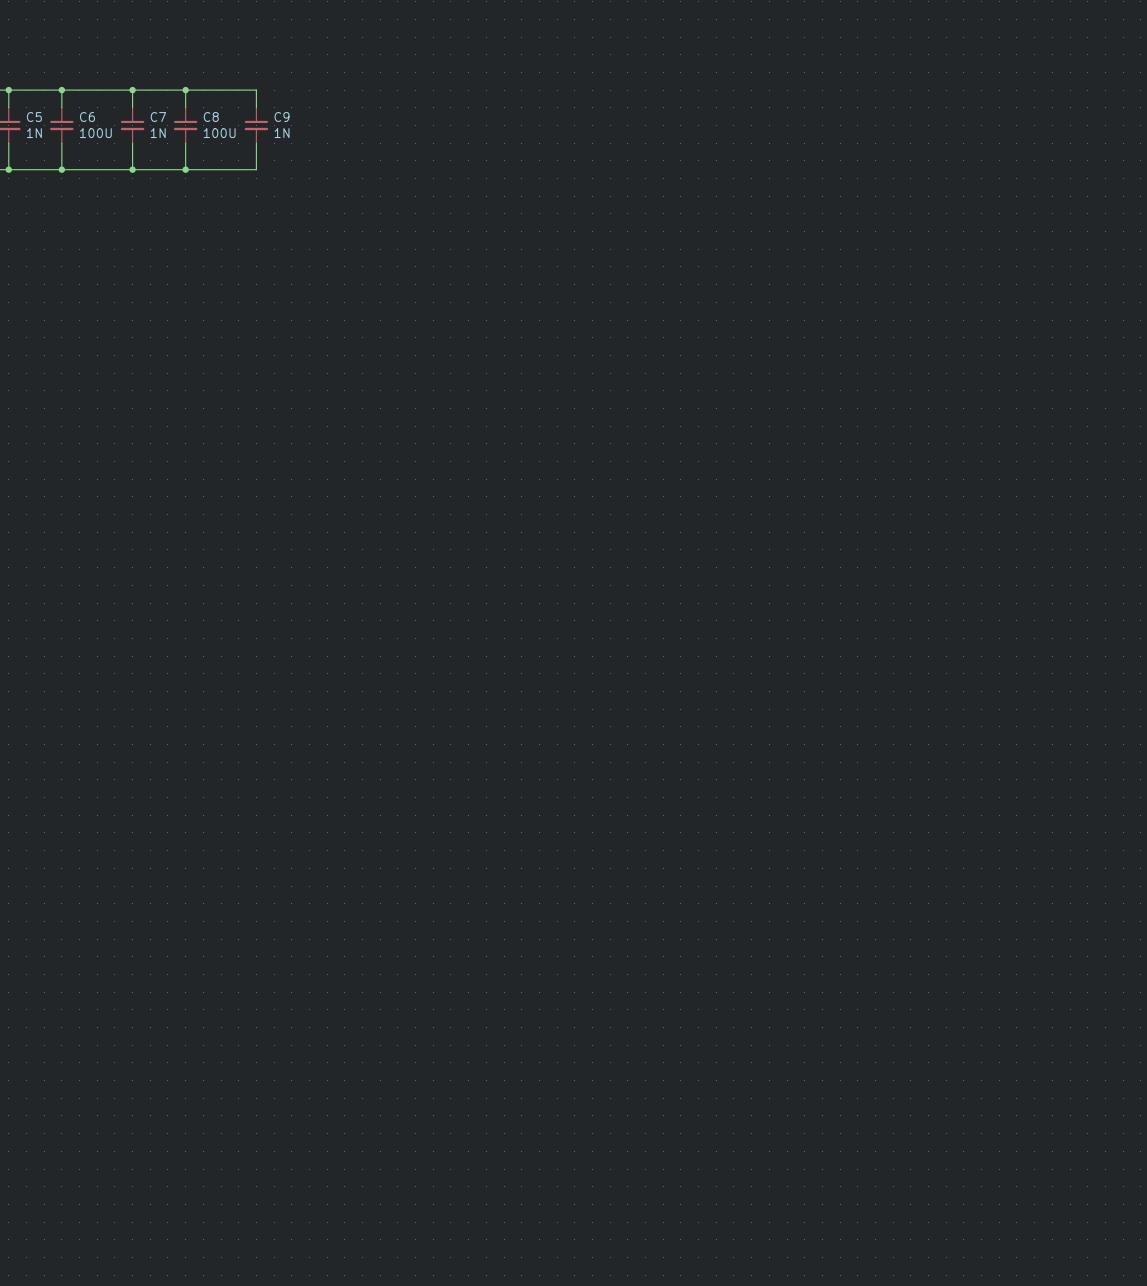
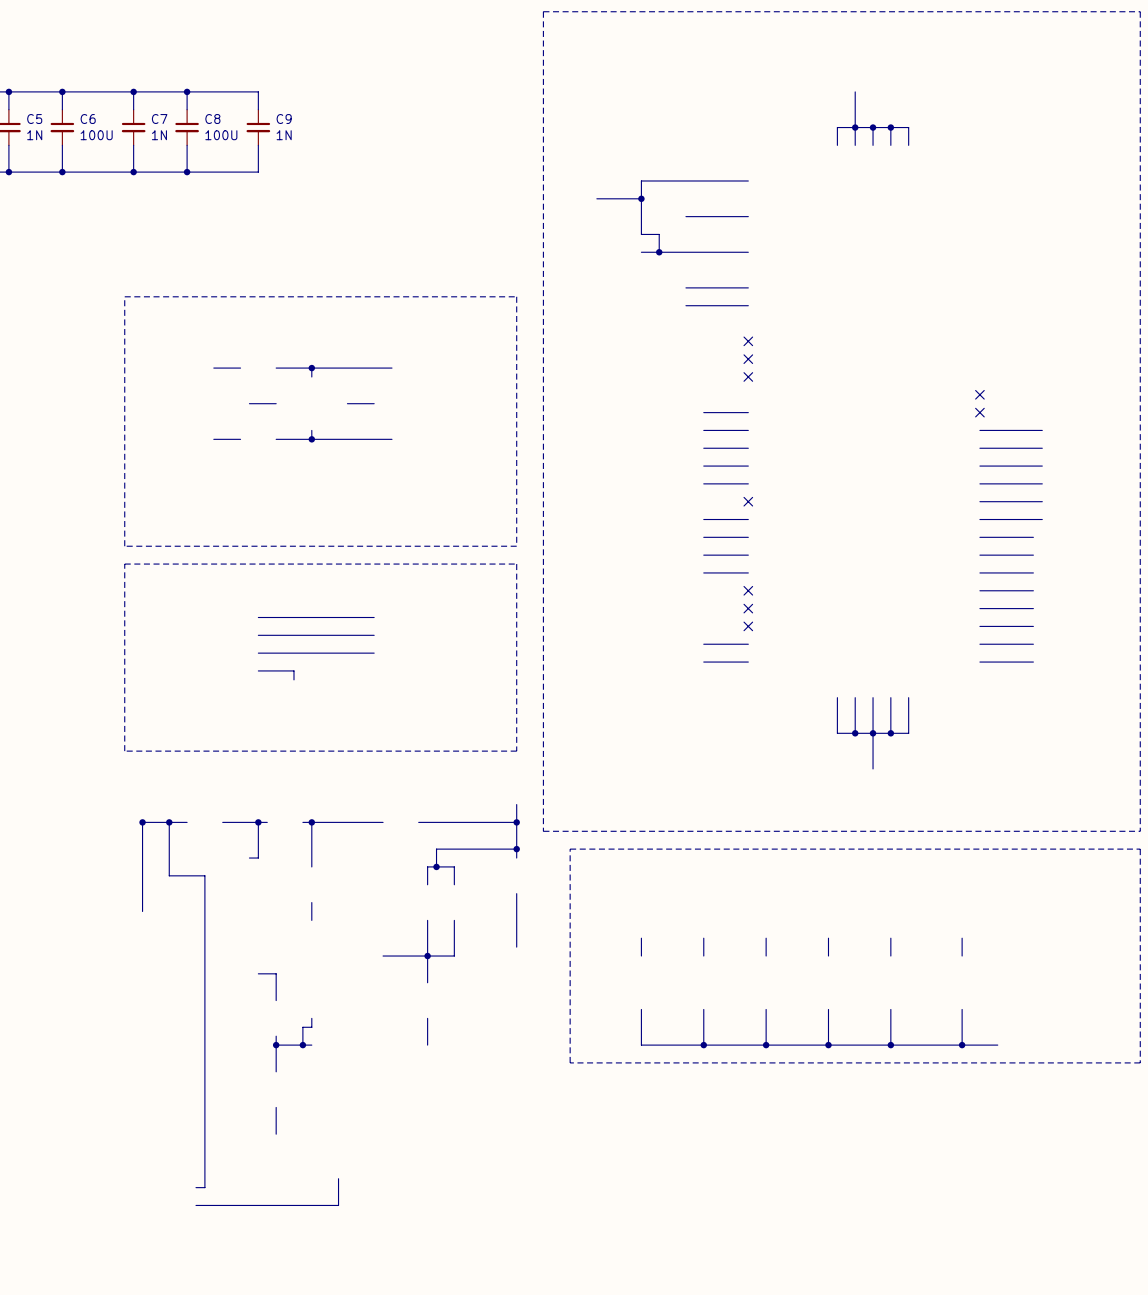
line: none -> (543, 11) (1140, 11) (1140, 831) (543, 831) (543, 11)
wire: none -> (855, 91) (855, 145)
junction: none -> (855, 127)
wire: none -> (873, 127) (873, 145)
junction: none -> (873, 127)
wire: none -> (890, 127) (890, 145)
junction: none -> (890, 127)
wire: none -> (837, 145) (837, 127) (908, 127) (908, 145)
wire: none -> (748, 180) (641, 180) (641, 234) (659, 234) (659, 252)
wire: none -> (596, 198) (641, 198)
junction: none -> (641, 198)
wire: none -> (685, 216) (748, 216)
wire: none -> (641, 252) (748, 252)
junction: none -> (659, 252)
wire: none -> (685, 287) (748, 287)
line: none -> (124, 296) (516, 296) (516, 546) (124, 546) (124, 296)
wire: none -> (685, 305) (748, 305)
no-connect mark: none -> (748, 341)
no-connect mark: none -> (748, 359)
wire: none -> (213, 368) (240, 368)
wire: none -> (276, 368) (391, 368)
wire: none -> (311, 368) (311, 376)
junction: none -> (311, 368)
no-connect mark: none -> (748, 376)
no-connect mark: none -> (979, 394)
wire: none -> (249, 403) (276, 403)
wire: none -> (347, 403) (374, 403)
wire: none -> (703, 412) (748, 412)
no-connect mark: none -> (979, 412)
wire: none -> (311, 430) (311, 439)
wire: none -> (703, 430) (748, 430)
wire: none -> (979, 430) (1042, 430)
wire: none -> (213, 439) (240, 439)
wire: none -> (276, 439) (391, 439)
junction: none -> (311, 439)
wire: none -> (703, 448) (748, 448)
wire: none -> (979, 448) (1042, 448)
wire: none -> (703, 466) (748, 466)
wire: none -> (979, 466) (1042, 466)
wire: none -> (703, 483) (748, 483)
wire: none -> (979, 483) (1042, 483)
no-connect mark: none -> (748, 501)
wire: none -> (979, 501) (1042, 501)
wire: none -> (703, 519) (748, 519)
wire: none -> (979, 519) (1042, 519)
wire: none -> (703, 537) (748, 537)
wire: none -> (979, 537) (1033, 537)
wire: none -> (703, 555) (748, 555)
wire: none -> (979, 555) (1033, 555)
line: none -> (124, 564) (124, 751) (516, 751) (516, 564) (124, 564)
wire: none -> (703, 572) (748, 572)
wire: none -> (979, 572) (1033, 572)
no-connect mark: none -> (748, 590)
wire: none -> (979, 590) (1033, 590)
no-connect mark: none -> (748, 608)
wire: none -> (979, 608) (1033, 608)
wire: none -> (258, 617) (374, 617)
no-connect mark: none -> (748, 626)
wire: none -> (979, 626) (1033, 626)
wire: none -> (258, 635) (374, 635)
wire: none -> (703, 644) (748, 644)
wire: none -> (979, 644) (1033, 644)
wire: none -> (258, 653) (374, 653)
wire: none -> (703, 662) (748, 662)
wire: none -> (979, 662) (1033, 662)
wire: none -> (258, 670) (293, 670) (293, 679)
wire: none -> (837, 697) (837, 733) (908, 733) (908, 697)
wire: none -> (855, 697) (855, 733)
wire: none -> (873, 697) (873, 768)
wire: none -> (890, 697) (890, 733)
junction: none -> (855, 733)
junction: none -> (873, 733)
junction: none -> (890, 733)
wire: none -> (516, 804) (516, 858)
junction: none -> (142, 822)
wire: none -> (169, 822) (169, 875) (204, 875) (204, 1187) (196, 1187)
junction: none -> (169, 822)
wire: none -> (187, 822) (142, 822) (142, 911)
wire: none -> (222, 822) (267, 822)
wire: none -> (258, 822) (258, 858) (249, 858)
junction: none -> (258, 822)
wire: none -> (302, 822) (383, 822)
wire: none -> (311, 822) (311, 866)
junction: none -> (311, 822)
wire: none -> (418, 822) (516, 822)
junction: none -> (516, 822)
wire: none -> (516, 849) (436, 849) (436, 866)
junction: none -> (516, 849)
line: none -> (570, 849) (570, 1062) (1140, 1062) (1140, 849) (570, 849)
junction: none -> (436, 866)
wire: none -> (427, 884) (427, 866) (454, 866) (454, 884)
wire: none -> (516, 893) (516, 947)
wire: none -> (311, 902) (311, 920)
wire: none -> (427, 920) (427, 982)
wire: none -> (454, 920) (454, 956) (383, 956)
wire: none -> (641, 938) (641, 956)
wire: none -> (703, 938) (703, 956)
wire: none -> (766, 938) (766, 956)
wire: none -> (828, 938) (828, 956)
wire: none -> (890, 938) (890, 956)
wire: none -> (962, 938) (962, 956)
junction: none -> (427, 956)
wire: none -> (258, 973) (276, 973) (276, 1000)
wire: none -> (641, 1009) (641, 1045) (997, 1045)
wire: none -> (703, 1009) (703, 1045)
wire: none -> (766, 1009) (766, 1045)
wire: none -> (828, 1009) (828, 1045)
wire: none -> (890, 1009) (890, 1045)
wire: none -> (962, 1009) (962, 1045)
wire: none -> (311, 1018) (311, 1027) (302, 1027) (302, 1045)
wire: none -> (427, 1018) (427, 1045)
wire: none -> (276, 1036) (276, 1071)
wire: none -> (276, 1045) (311, 1045)
junction: none -> (276, 1045)
junction: none -> (302, 1045)
junction: none -> (703, 1045)
junction: none -> (766, 1045)
junction: none -> (828, 1045)
junction: none -> (890, 1045)
junction: none -> (962, 1045)
wire: none -> (276, 1107) (276, 1134)
wire: none -> (338, 1178) (338, 1205) (196, 1205)

